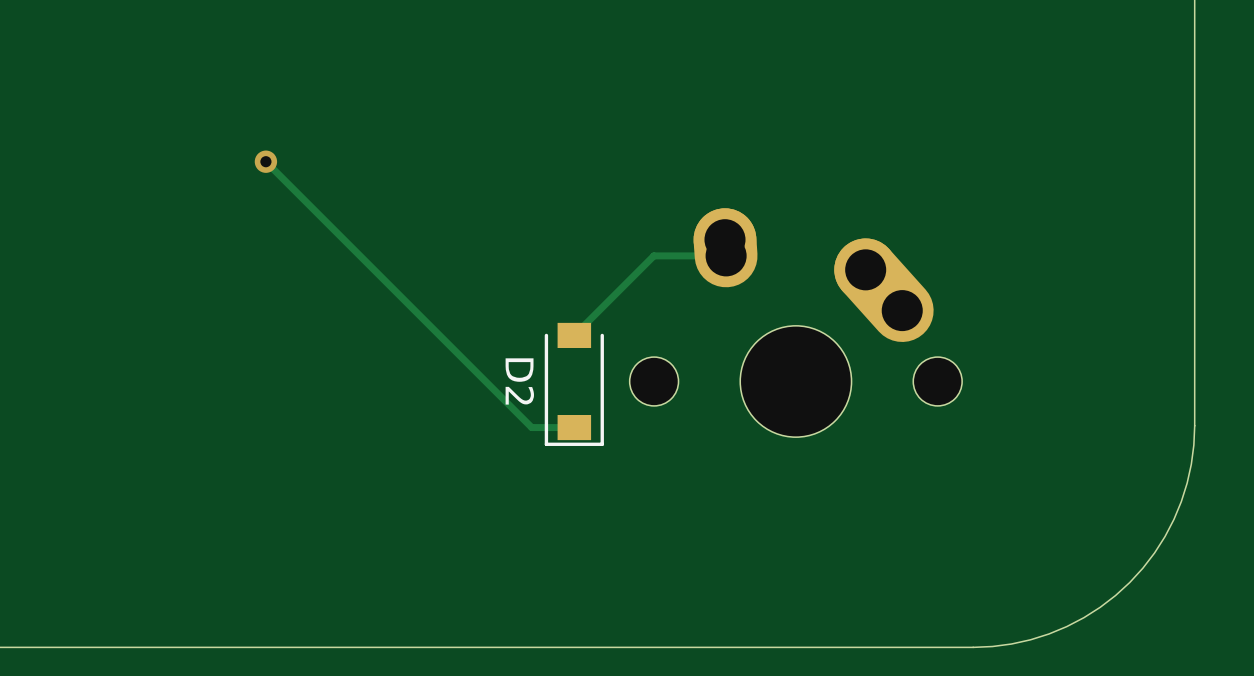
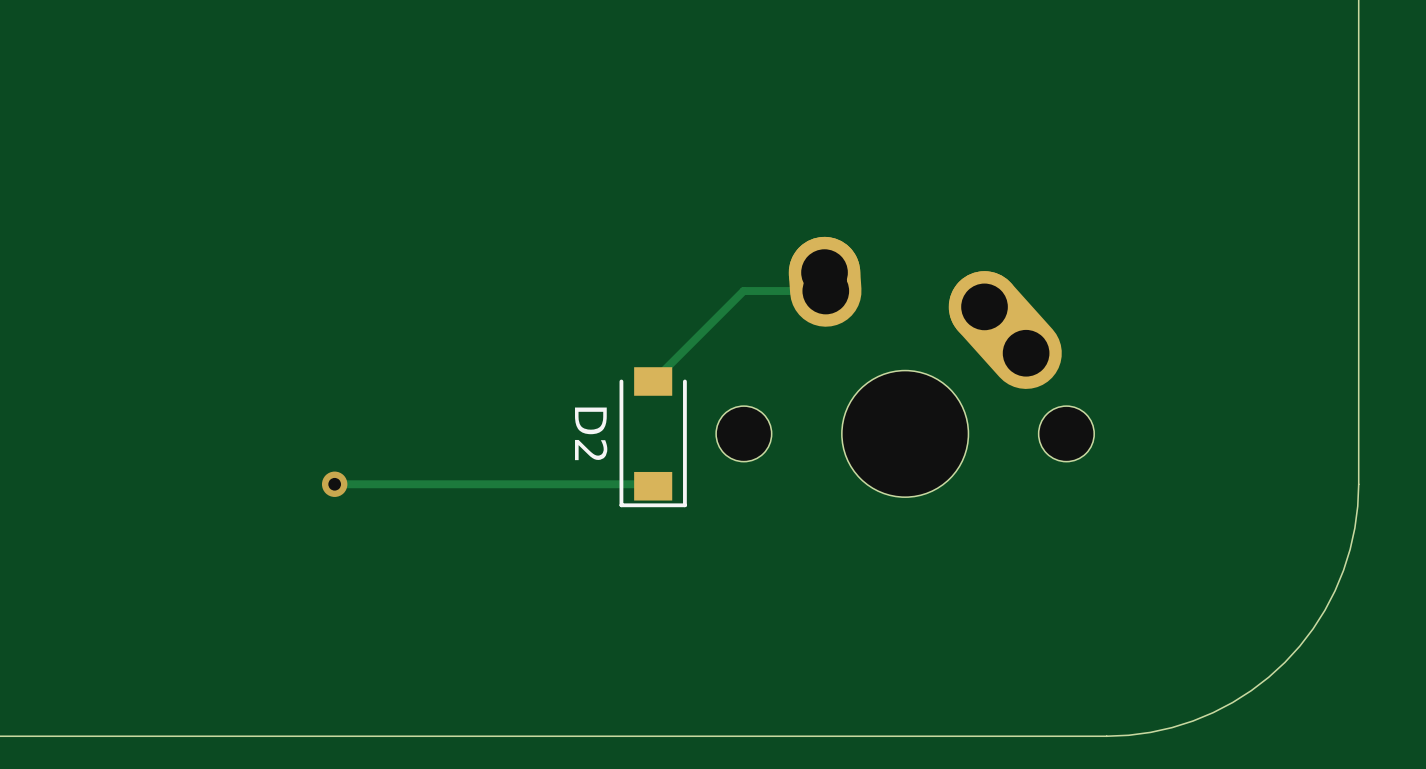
track: (265, 161) (531, 427) (574, 427) -> (336, 486) (334, 484) (651, 484) (653, 486)
via: (265, 161) -> none
via: none -> (334, 484)

